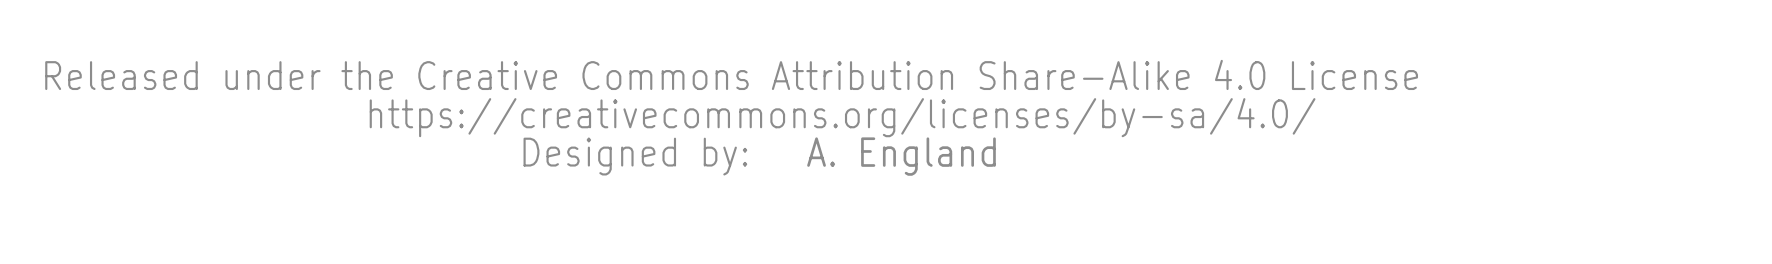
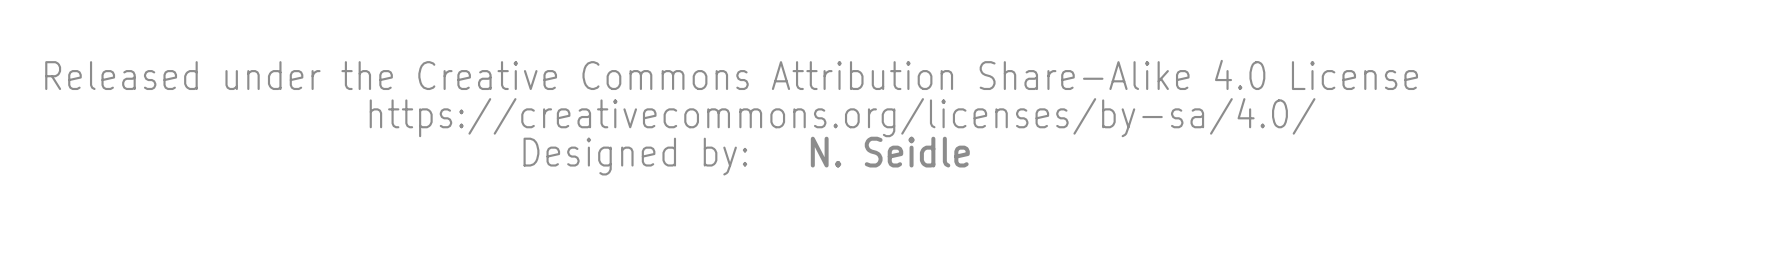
text: A. England (901, 156) -> N. Seidle (890, 152)

